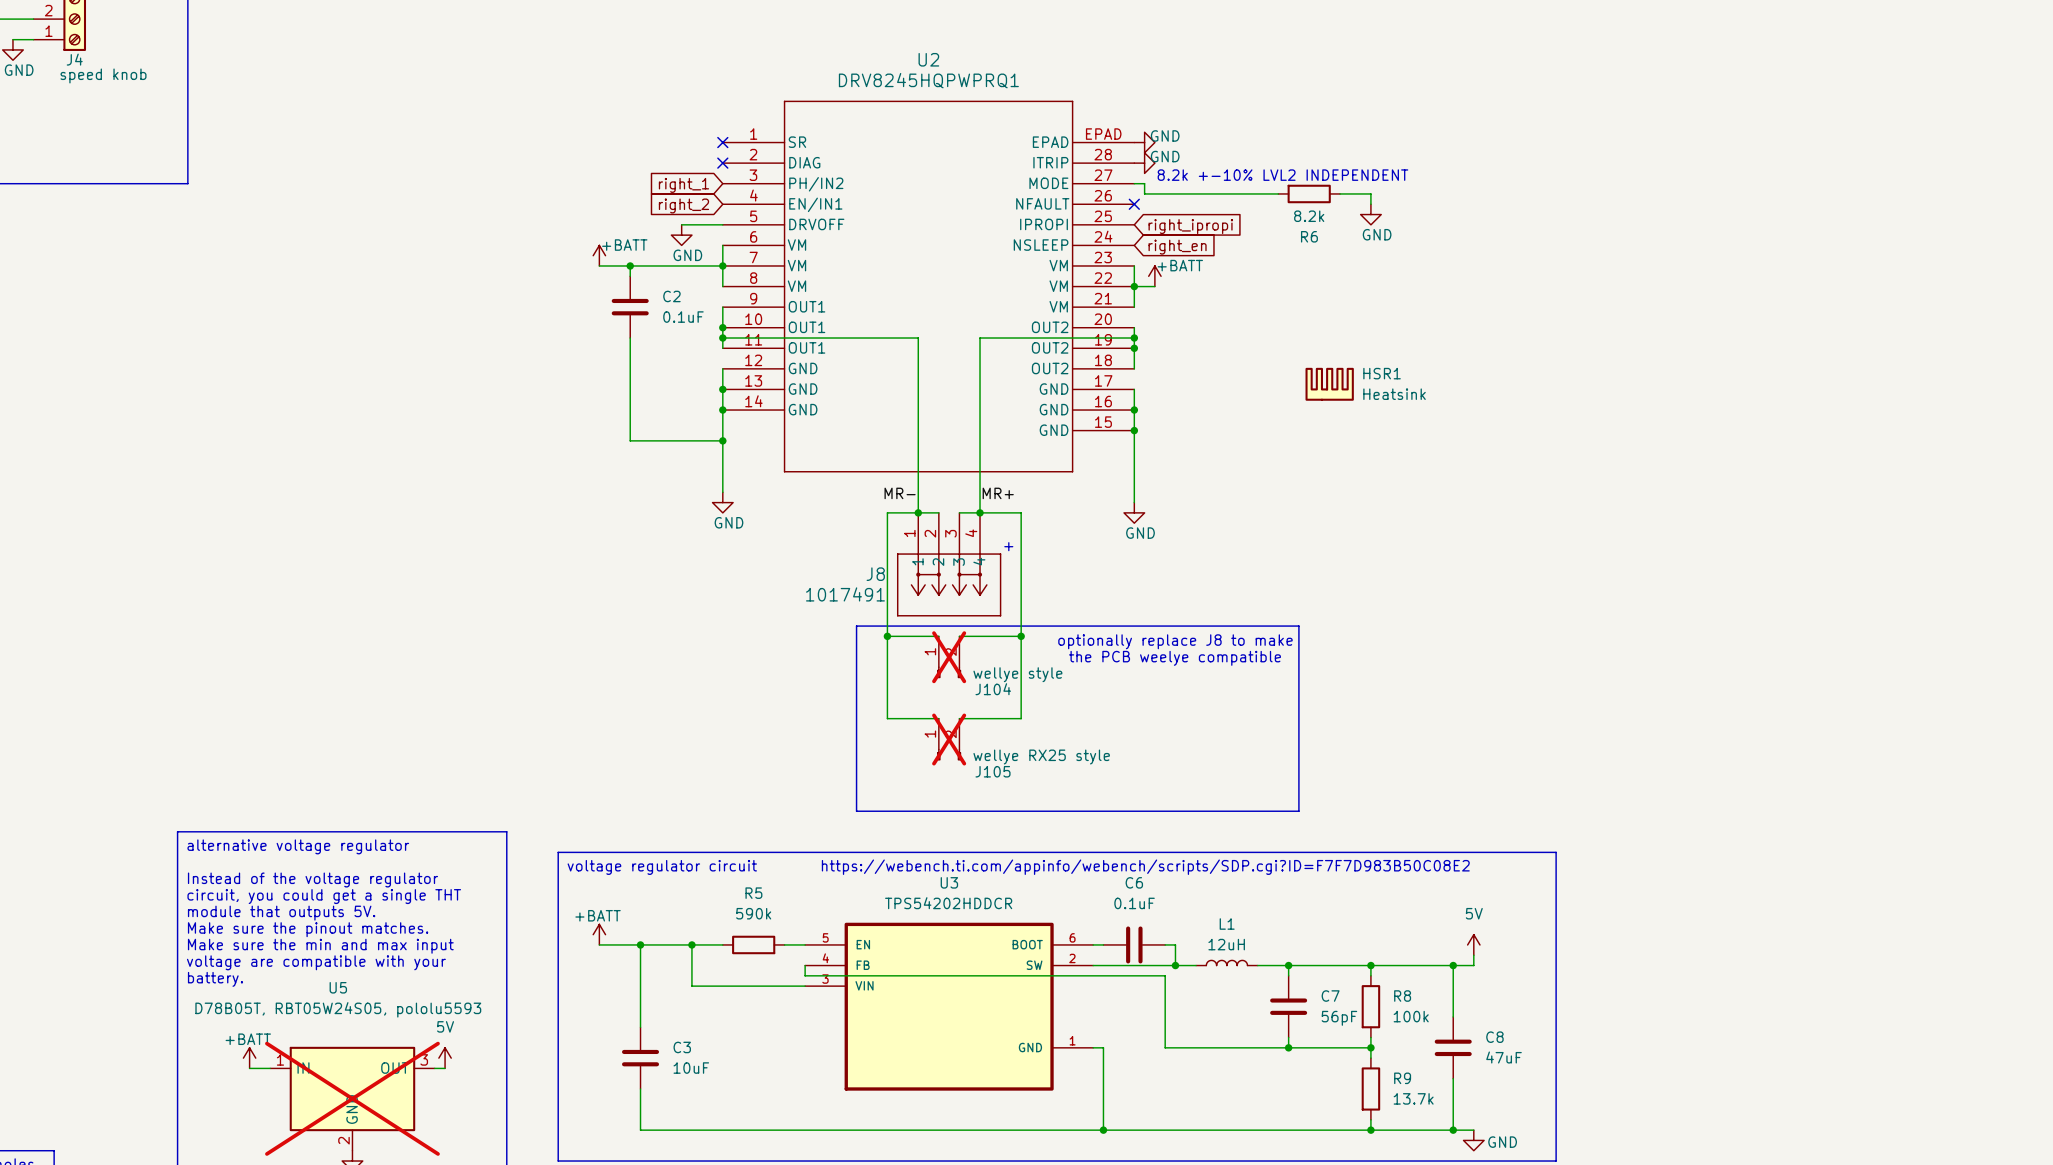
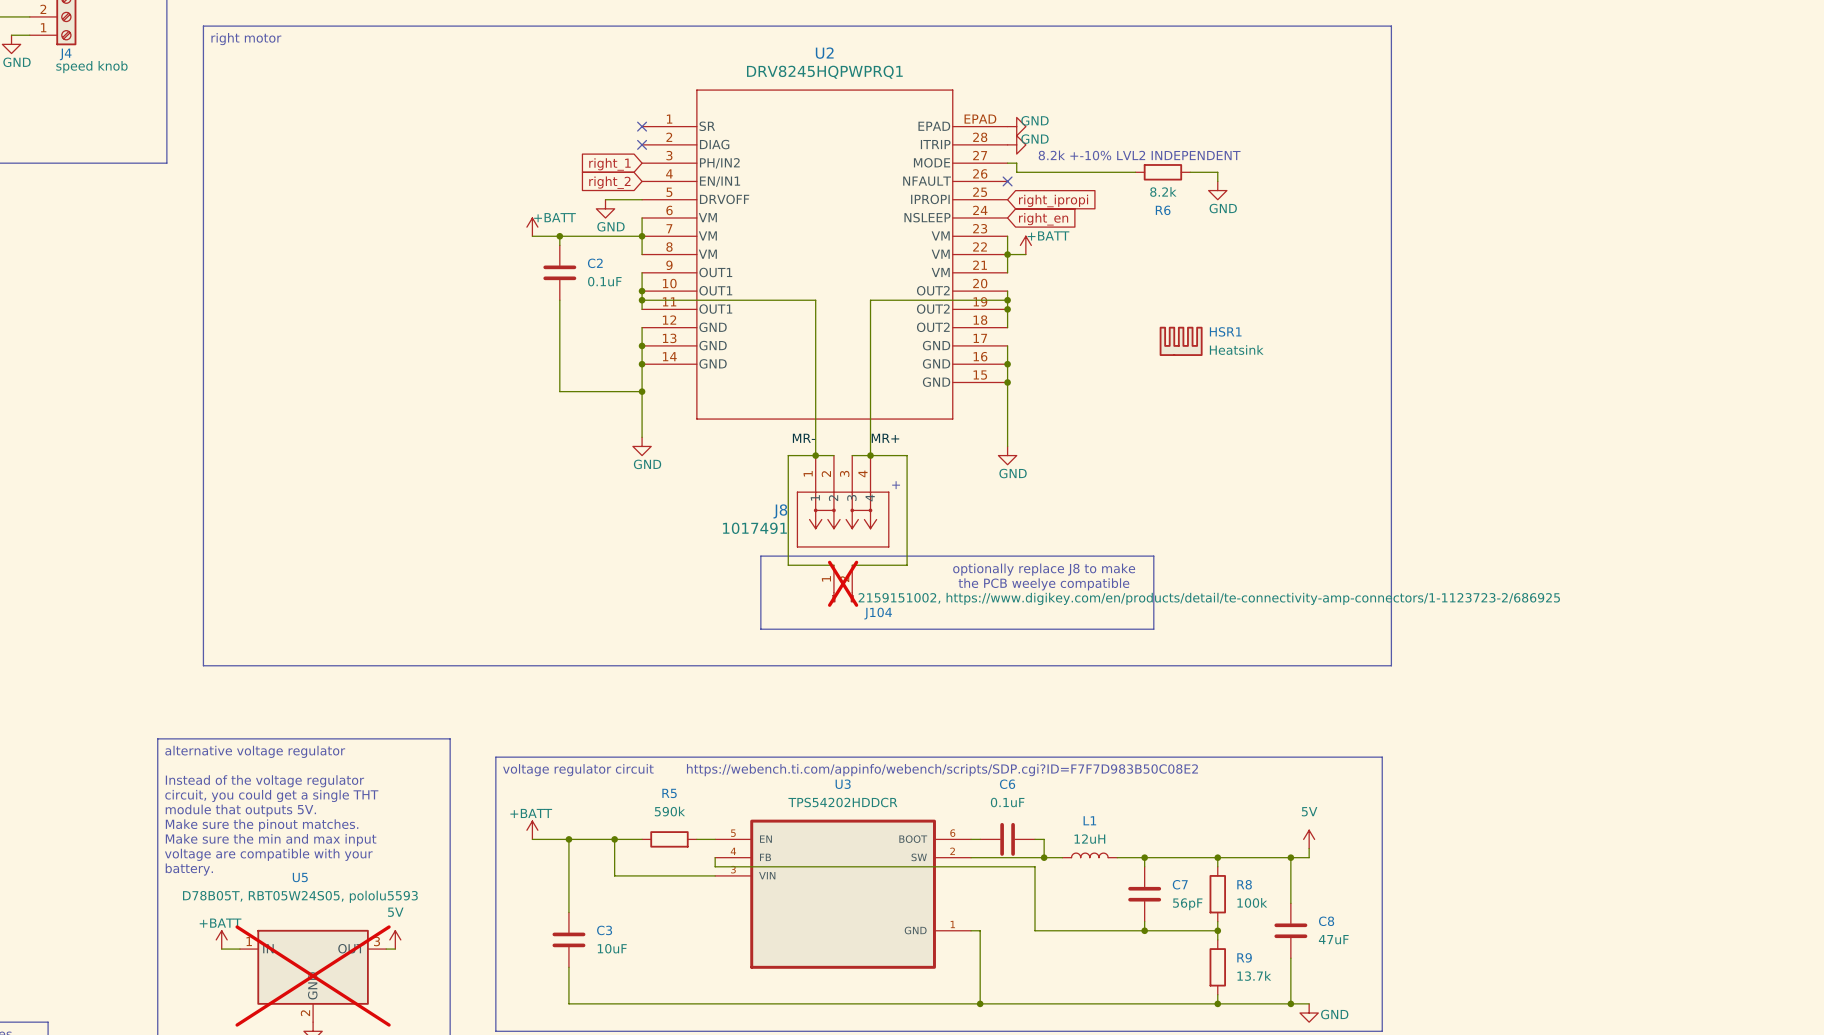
line: none -> (203, 26) (1391, 26) (1391, 665) (203, 665) (203, 26)
text: none -> right motor (246, 39)
wire: (887, 636) (887, 718) (938, 718) -> none
junction: (887, 636) -> none
wire: (1021, 636) (1021, 718) (959, 718) -> none
junction: (1021, 636) -> none
J104 value: wellye style (1017, 674) -> 2159151002, https://www.digikey.com/en/products/detail/te-connectivity-amp-connectors/1-1123723-2/686925 (1209, 598)
line: (856, 708) (856, 811) (1298, 811) (1298, 708) -> (760, 629) (1153, 629)
J105: wellye RX25 style (949, 739) -> none

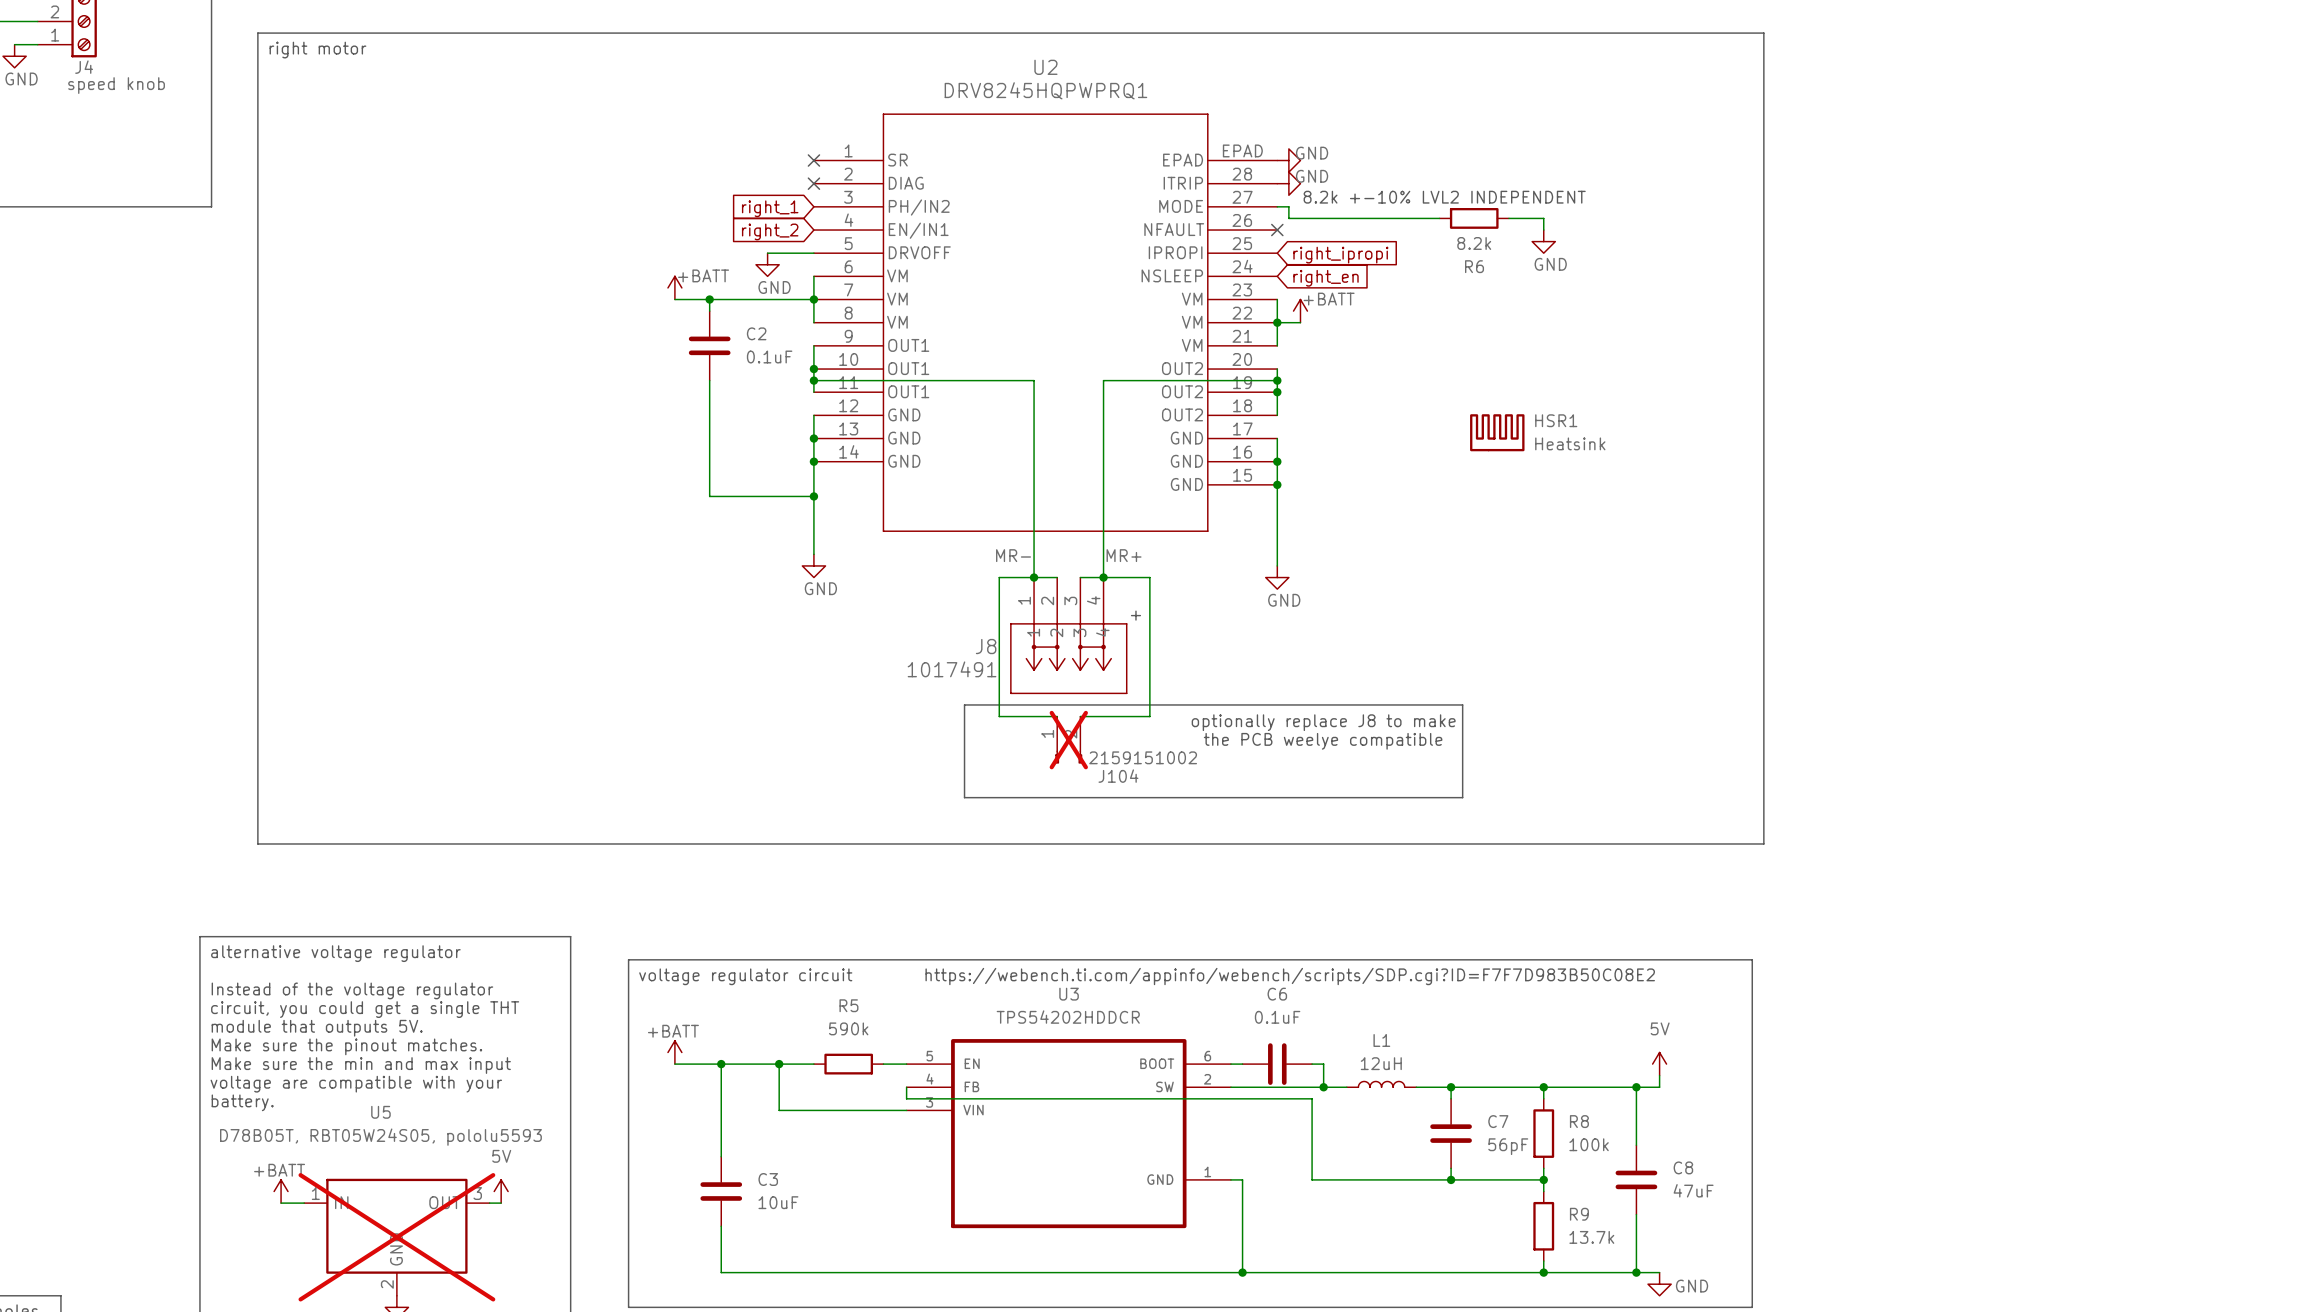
J104 value: 2159151002, https://www.digikey.com/en/products/detail/te-connectivity-amp-connectors/1-1123723-2/686925 (1209, 598) -> 2159151002 (1143, 757)

